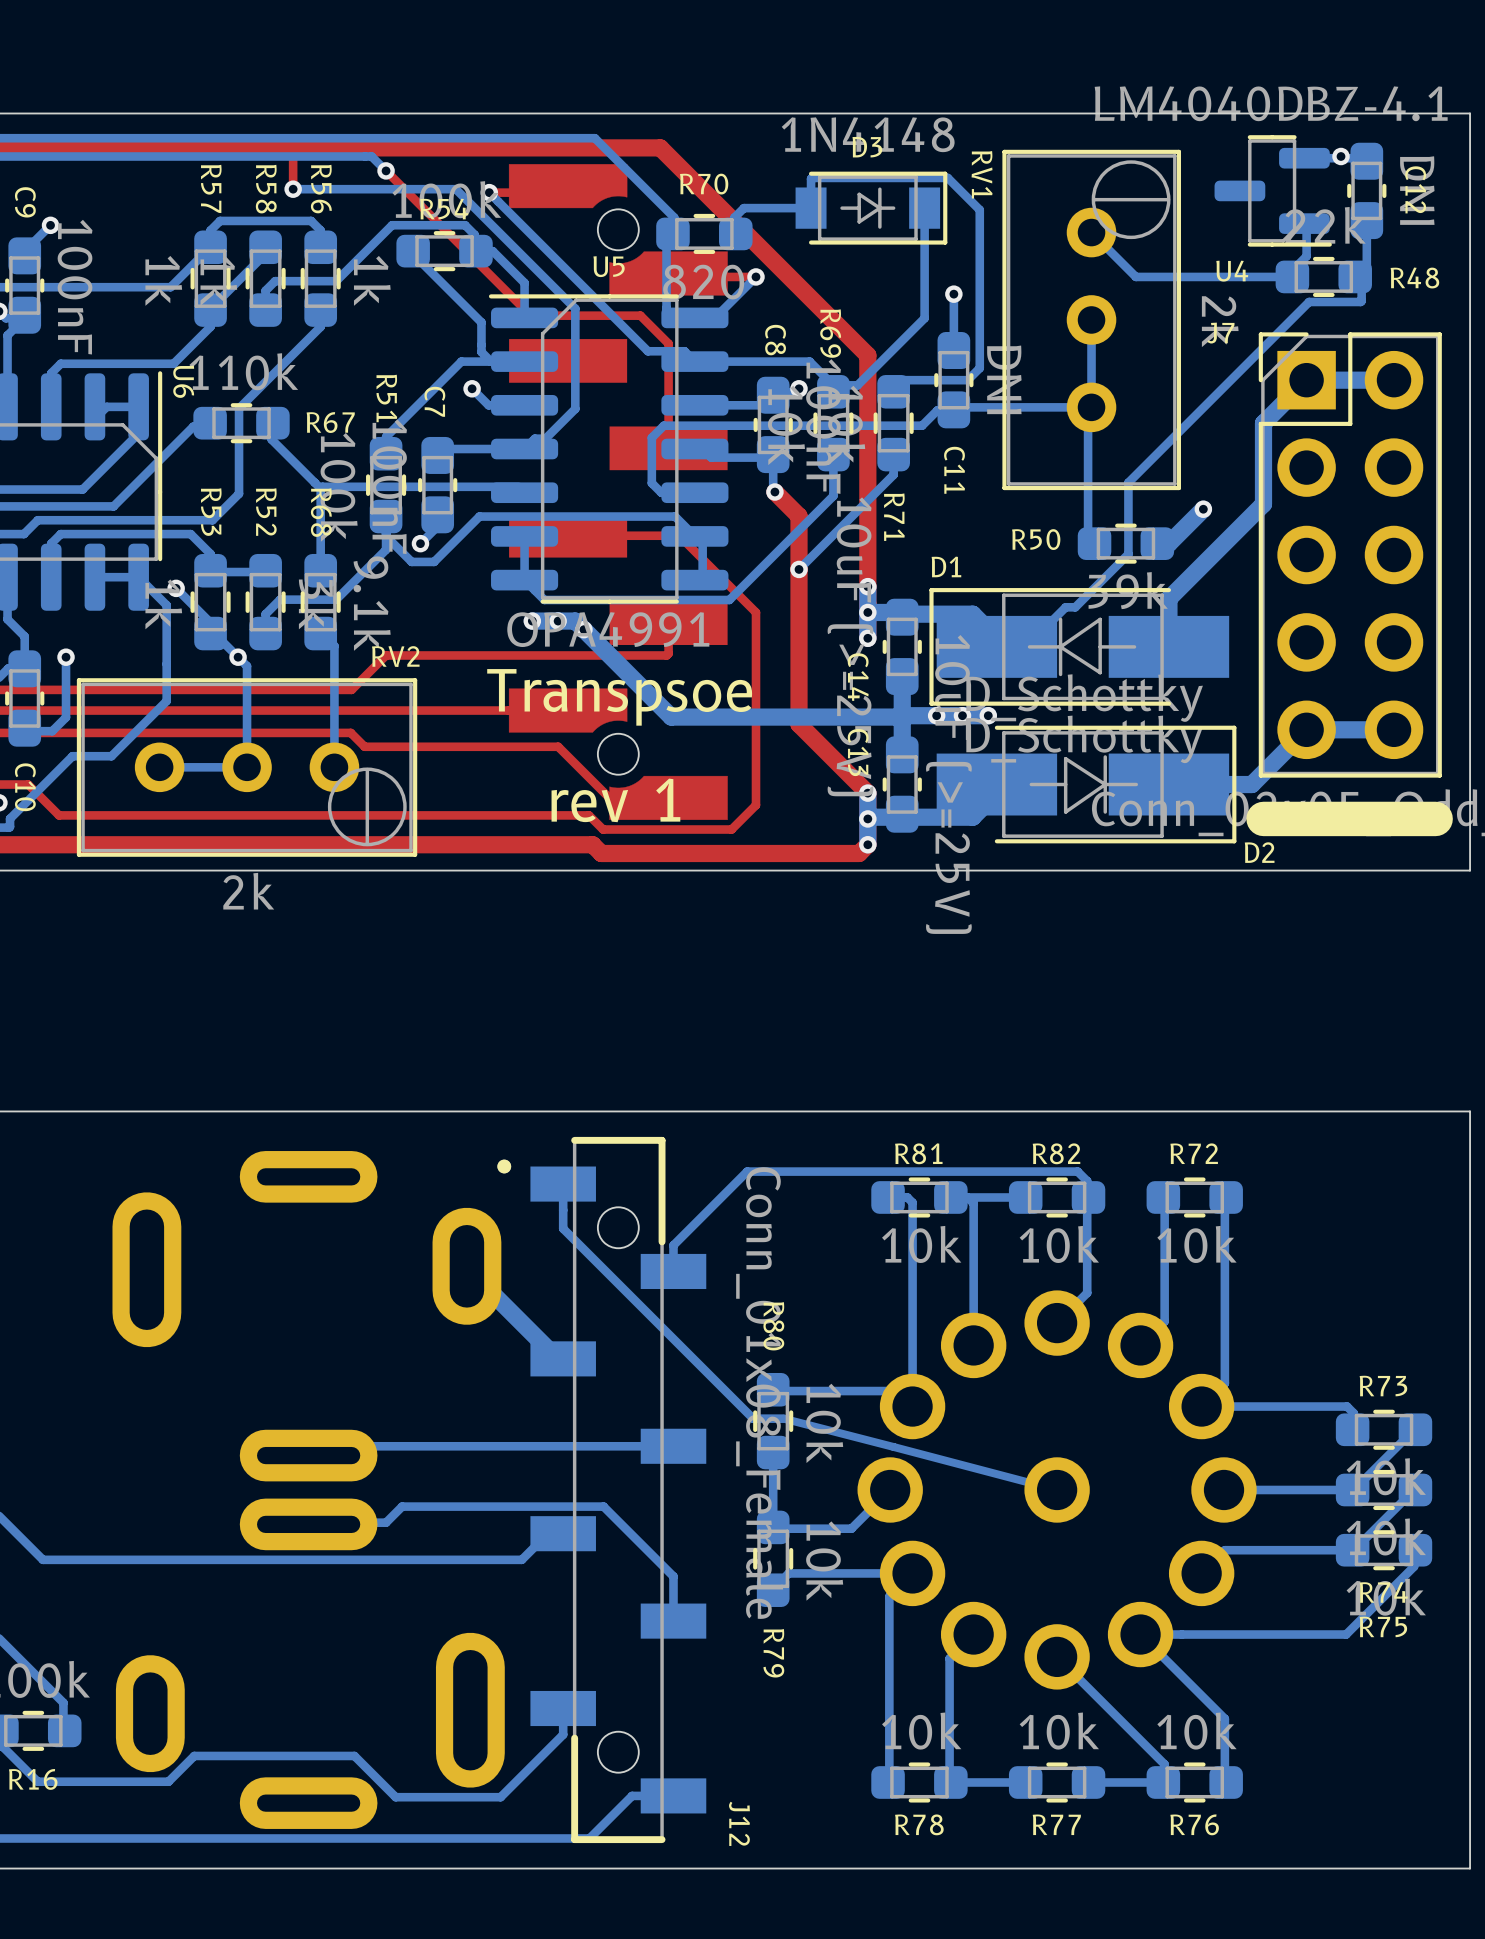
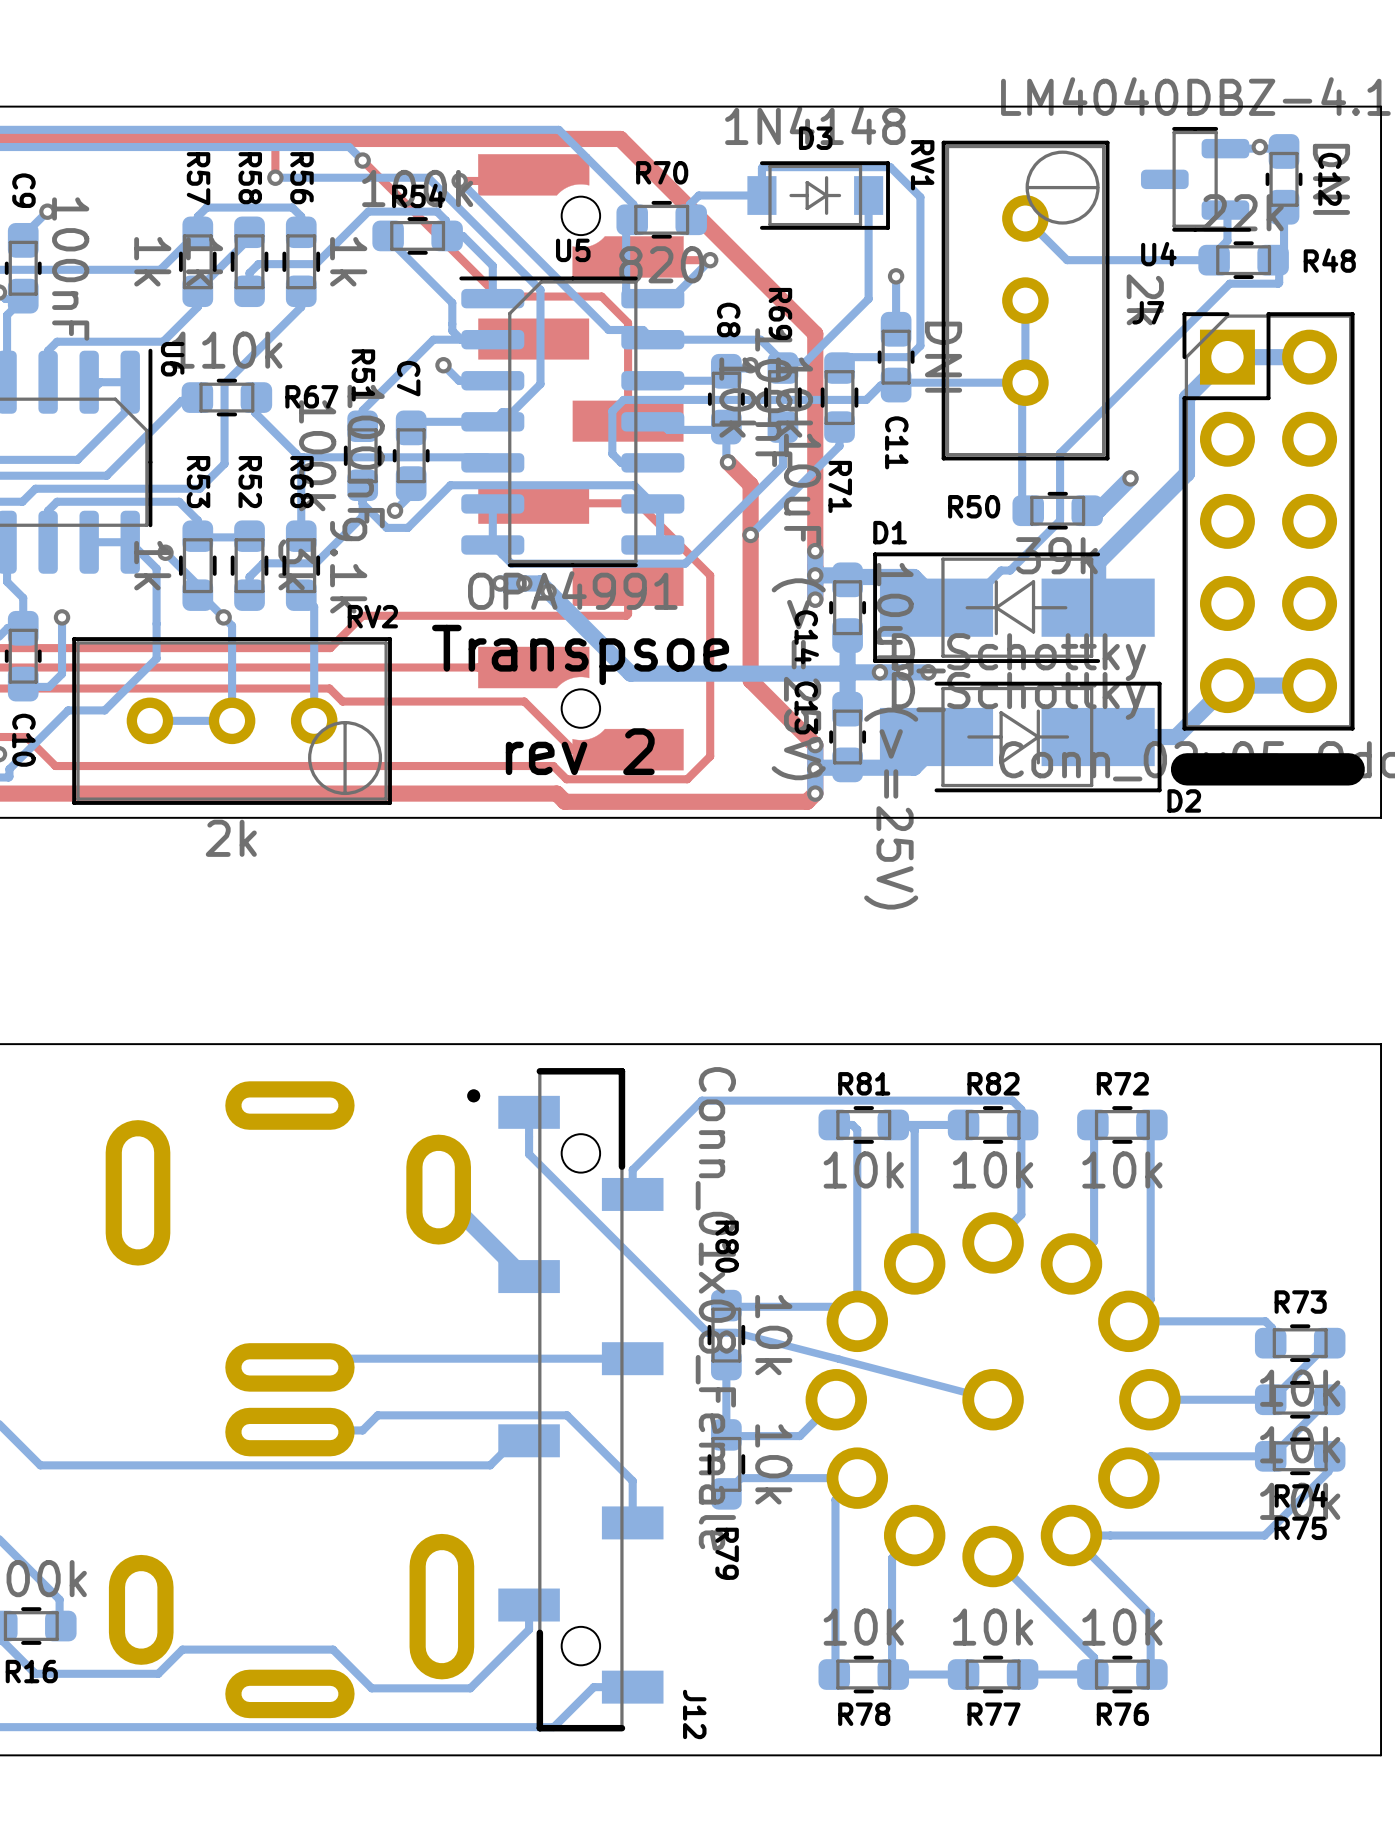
text: rev 1 (615, 800) -> rev 2 (580, 751)

